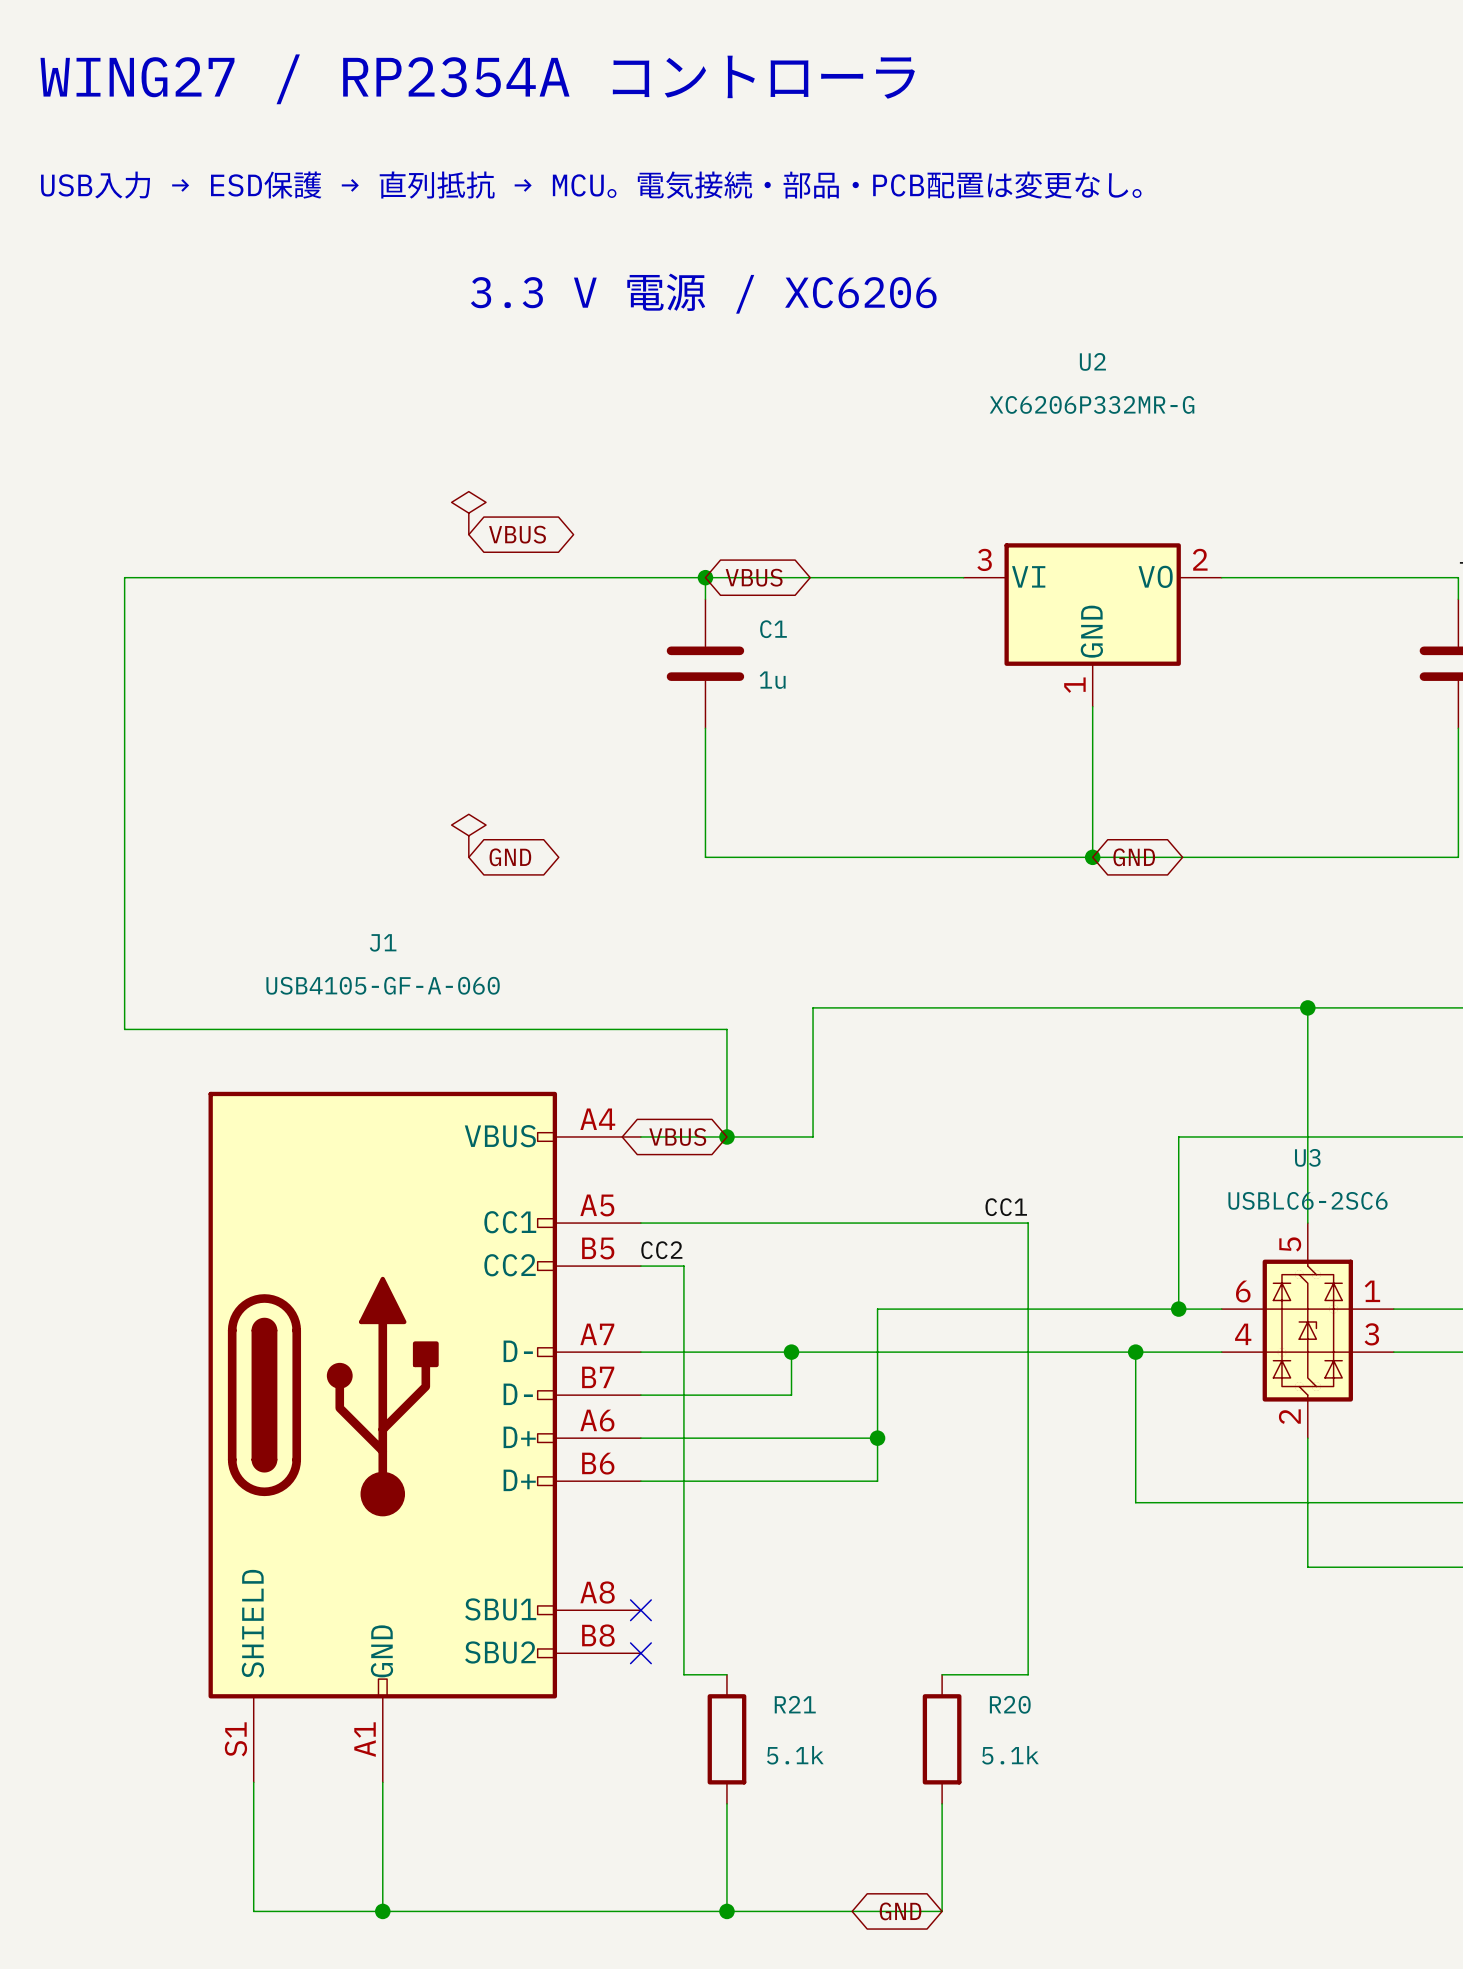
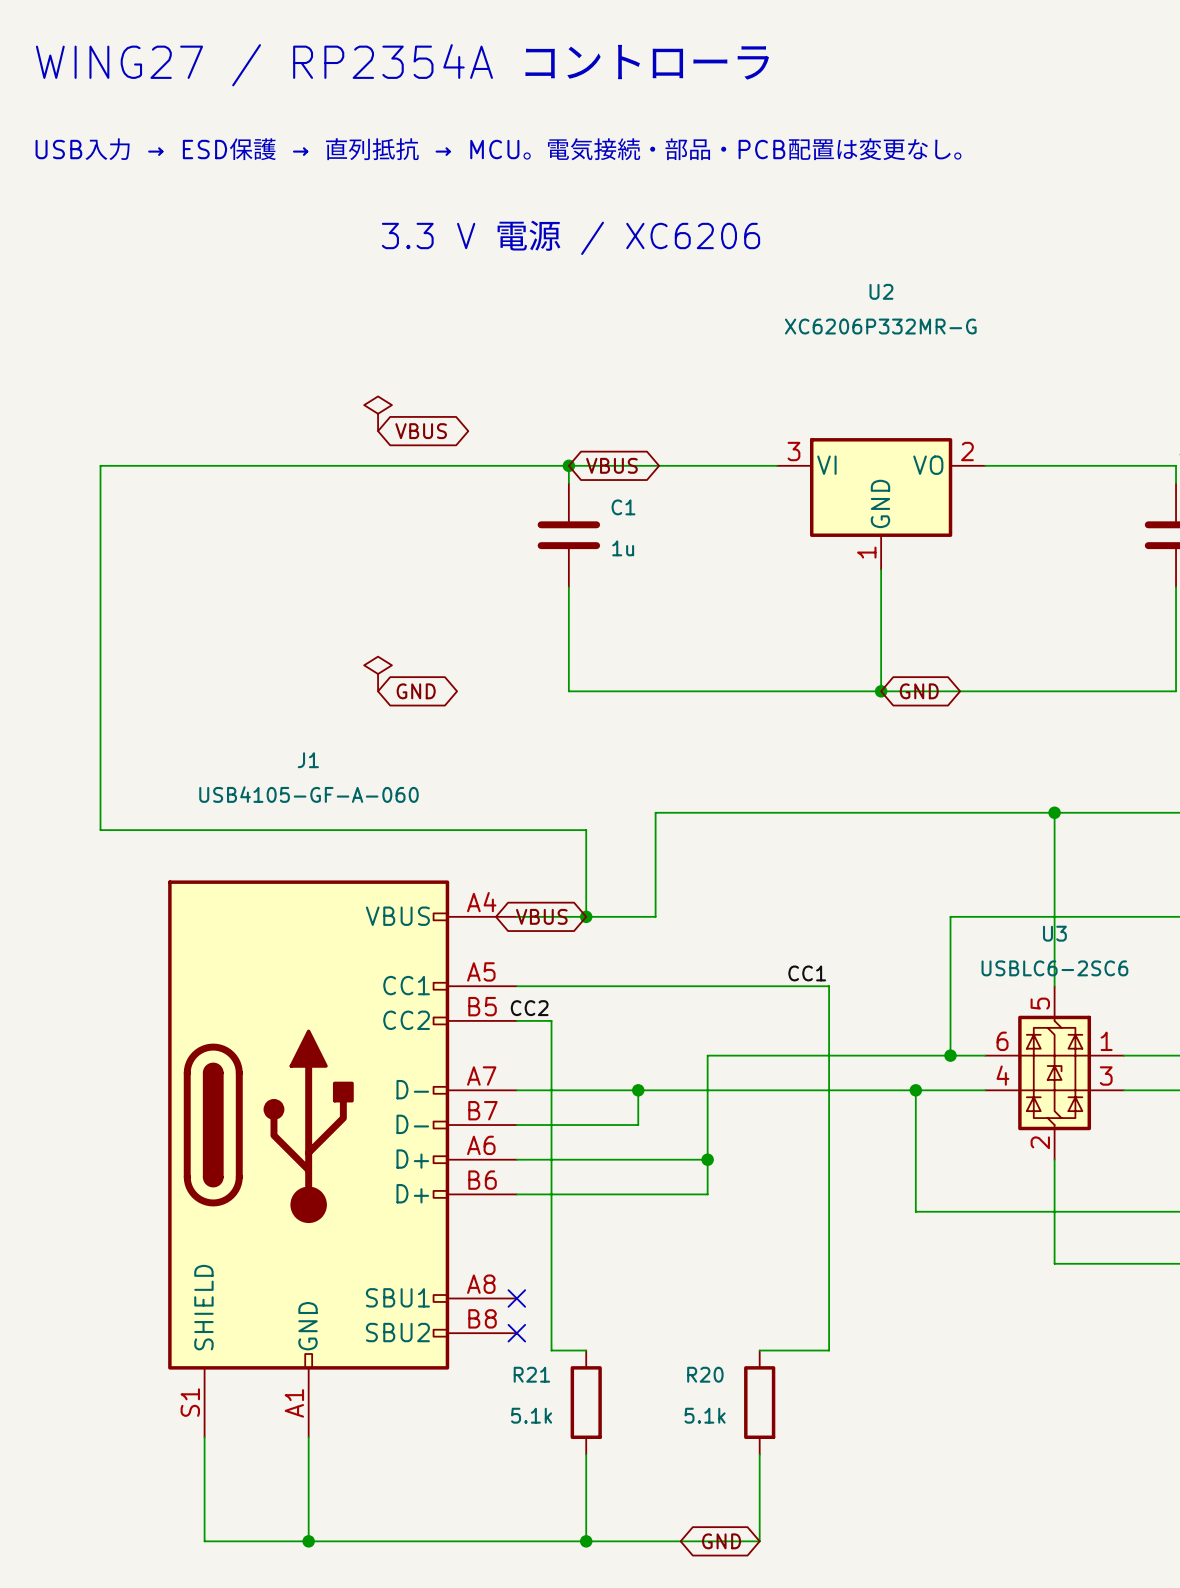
R21 name position: R21 (795, 1704) -> R21 (531, 1374)
R20 name position: R20 (1010, 1704) -> R20 (705, 1374)
R21 value position: 5.1k (795, 1755) -> 5.1k (531, 1415)
R20 value position: 5.1k (1010, 1755) -> 5.1k (705, 1415)

